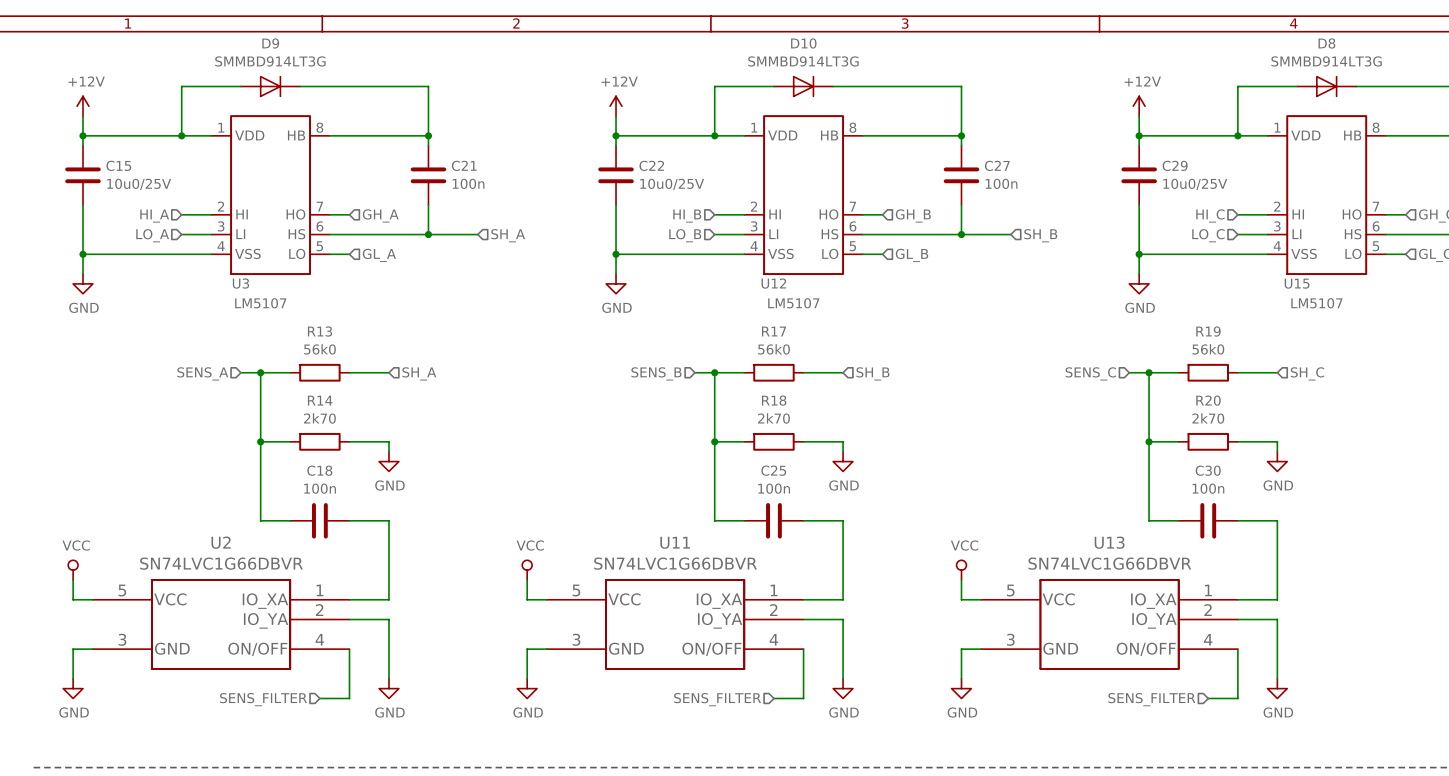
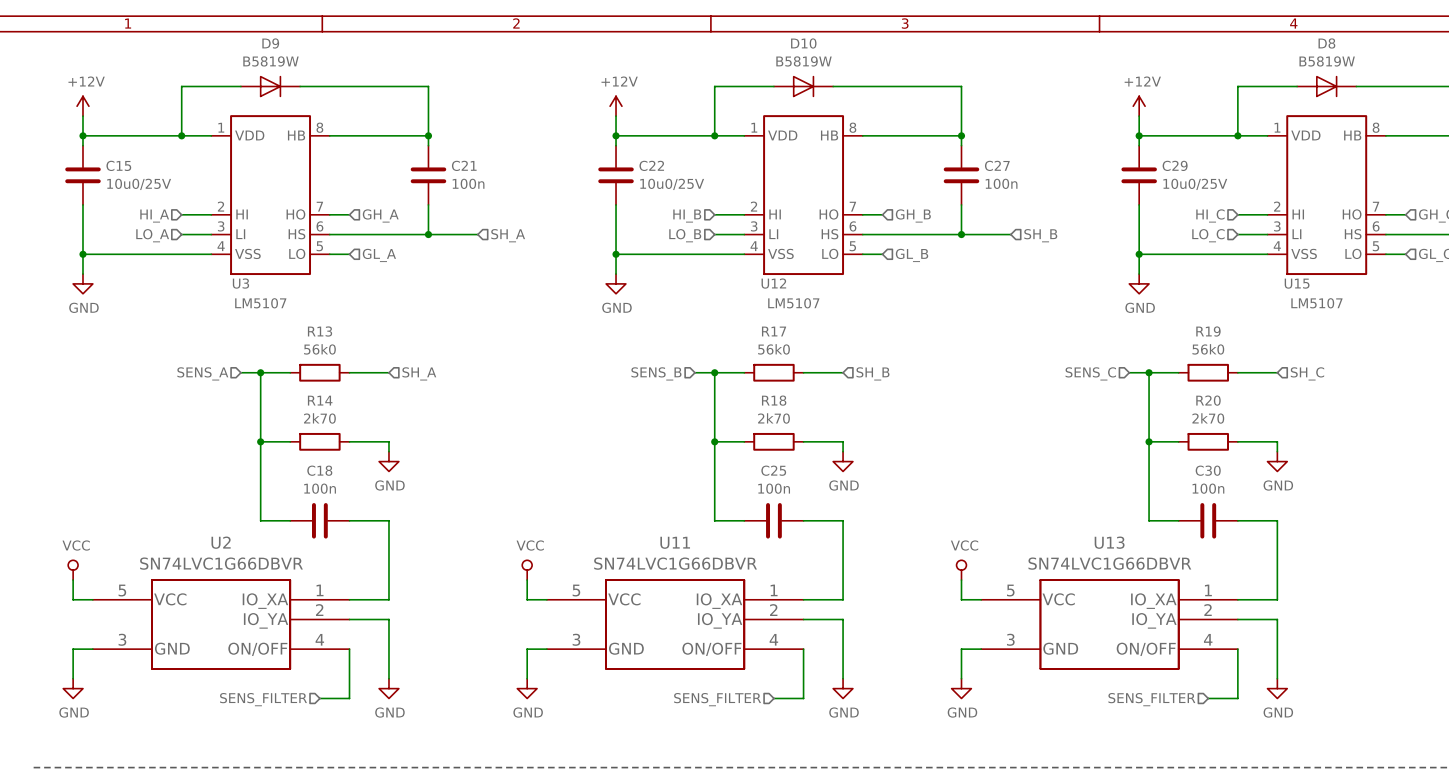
D9 value: SMMBD914LT3G (270, 61) -> B5819W (270, 61)
D10 value: SMMBD914LT3G (803, 61) -> B5819W (804, 61)
D8 value: SMMBD914LT3G (1326, 61) -> B5819W (1327, 61)

